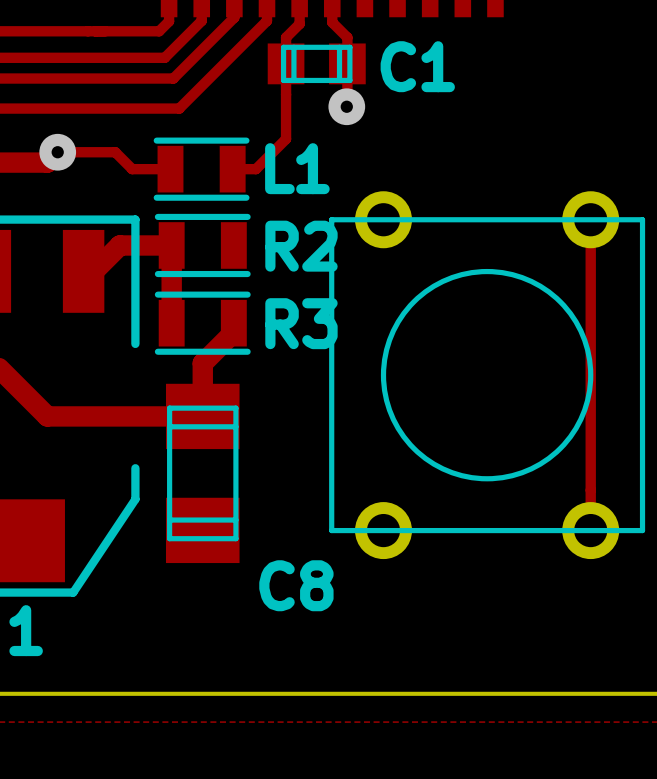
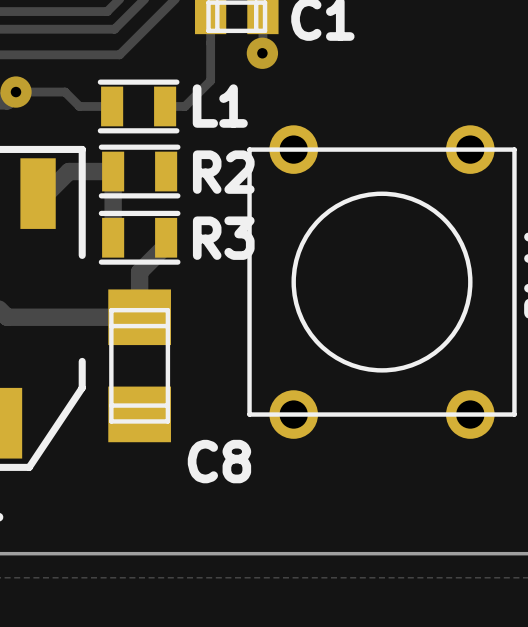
track: (590, 219) (590, 530) -> none

